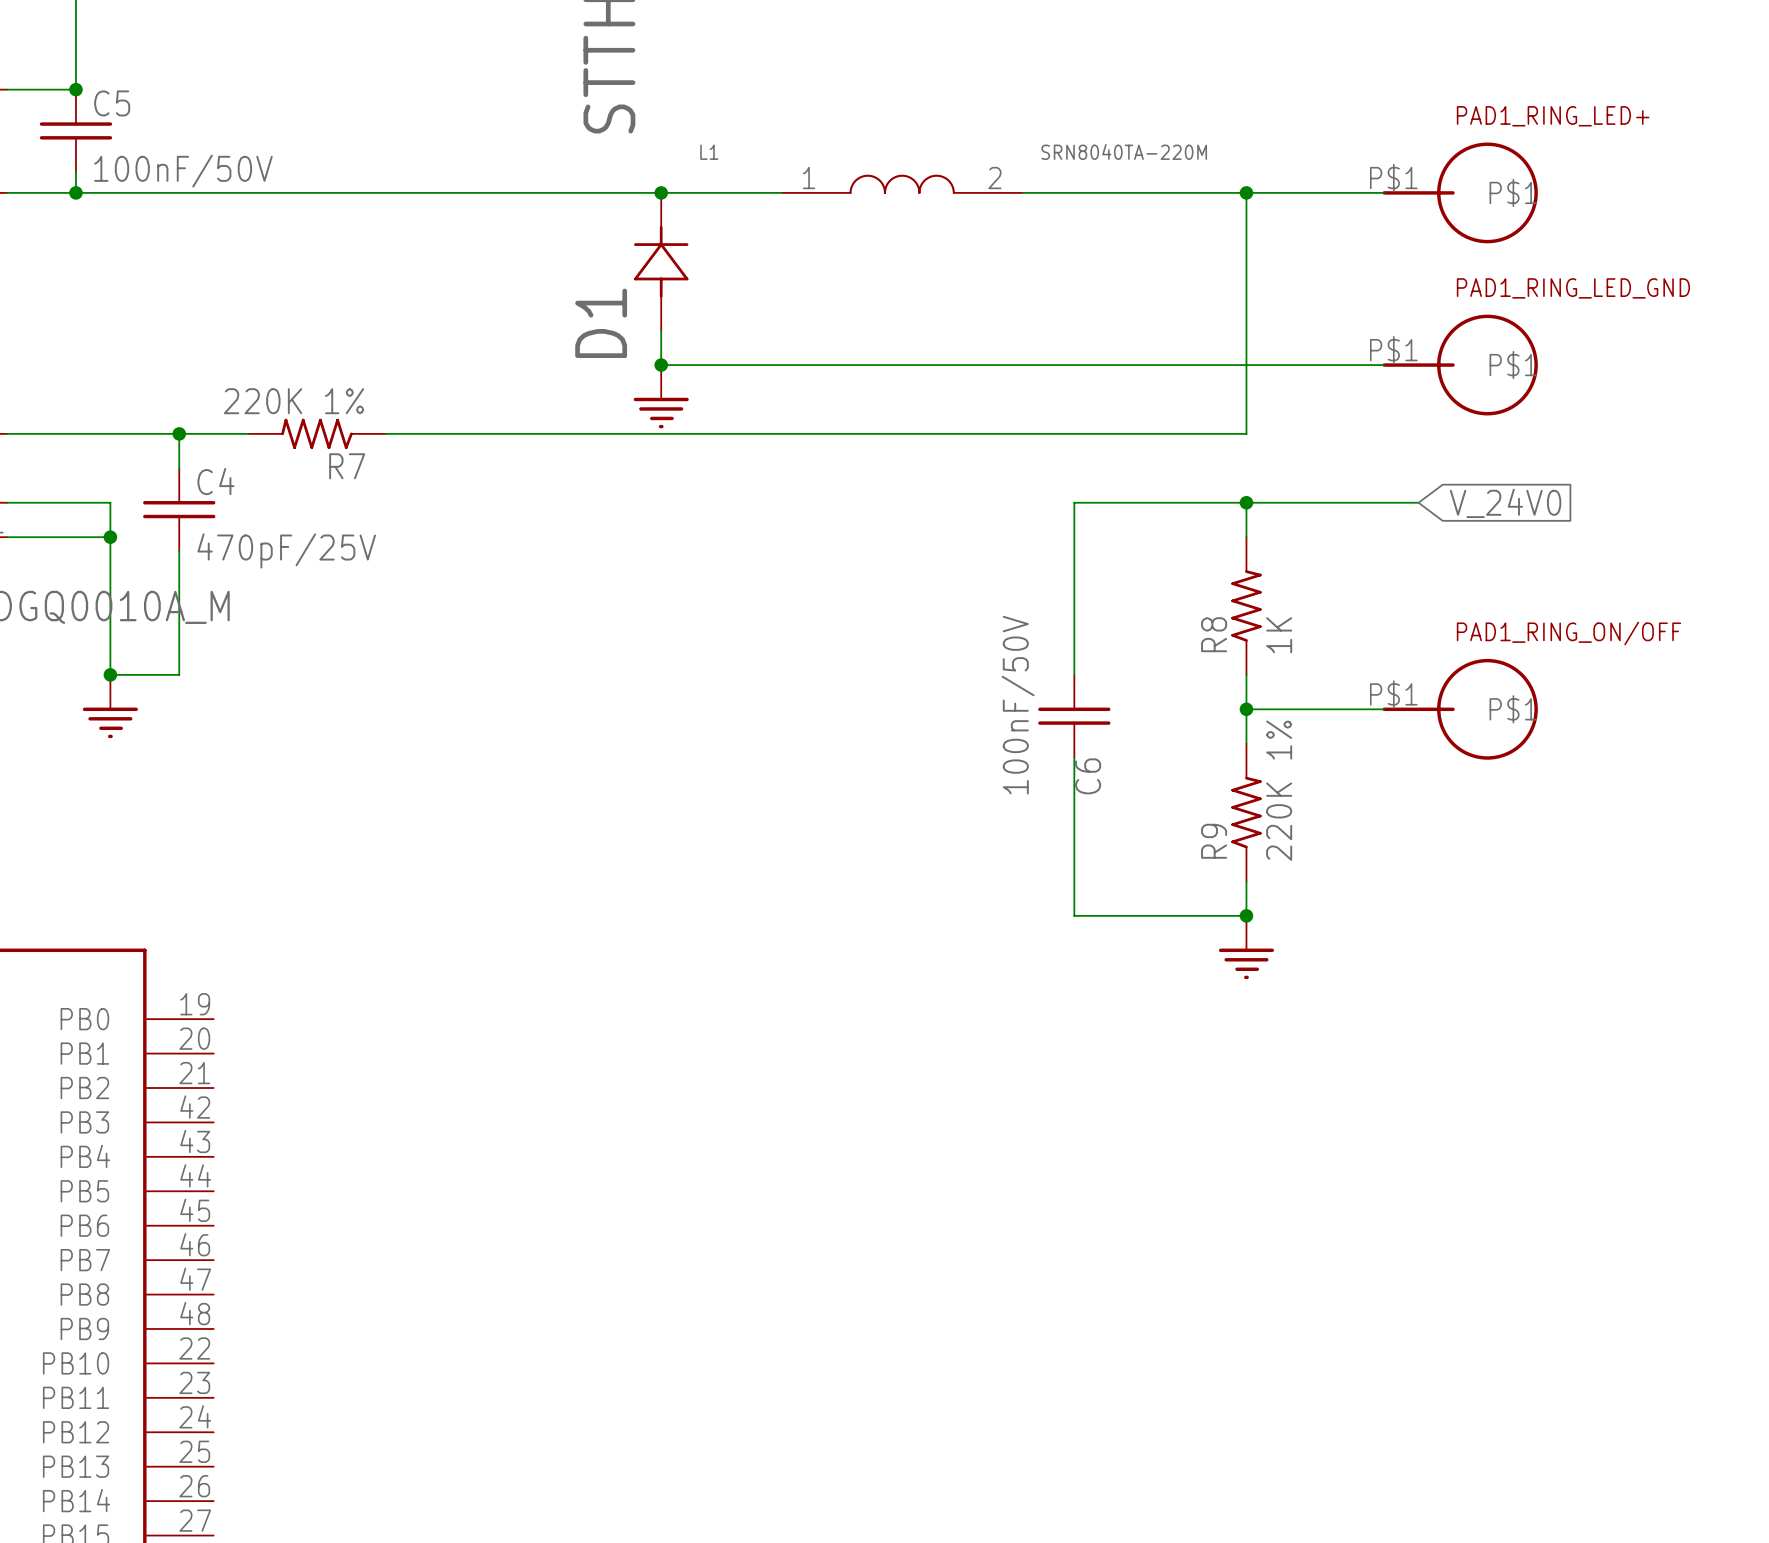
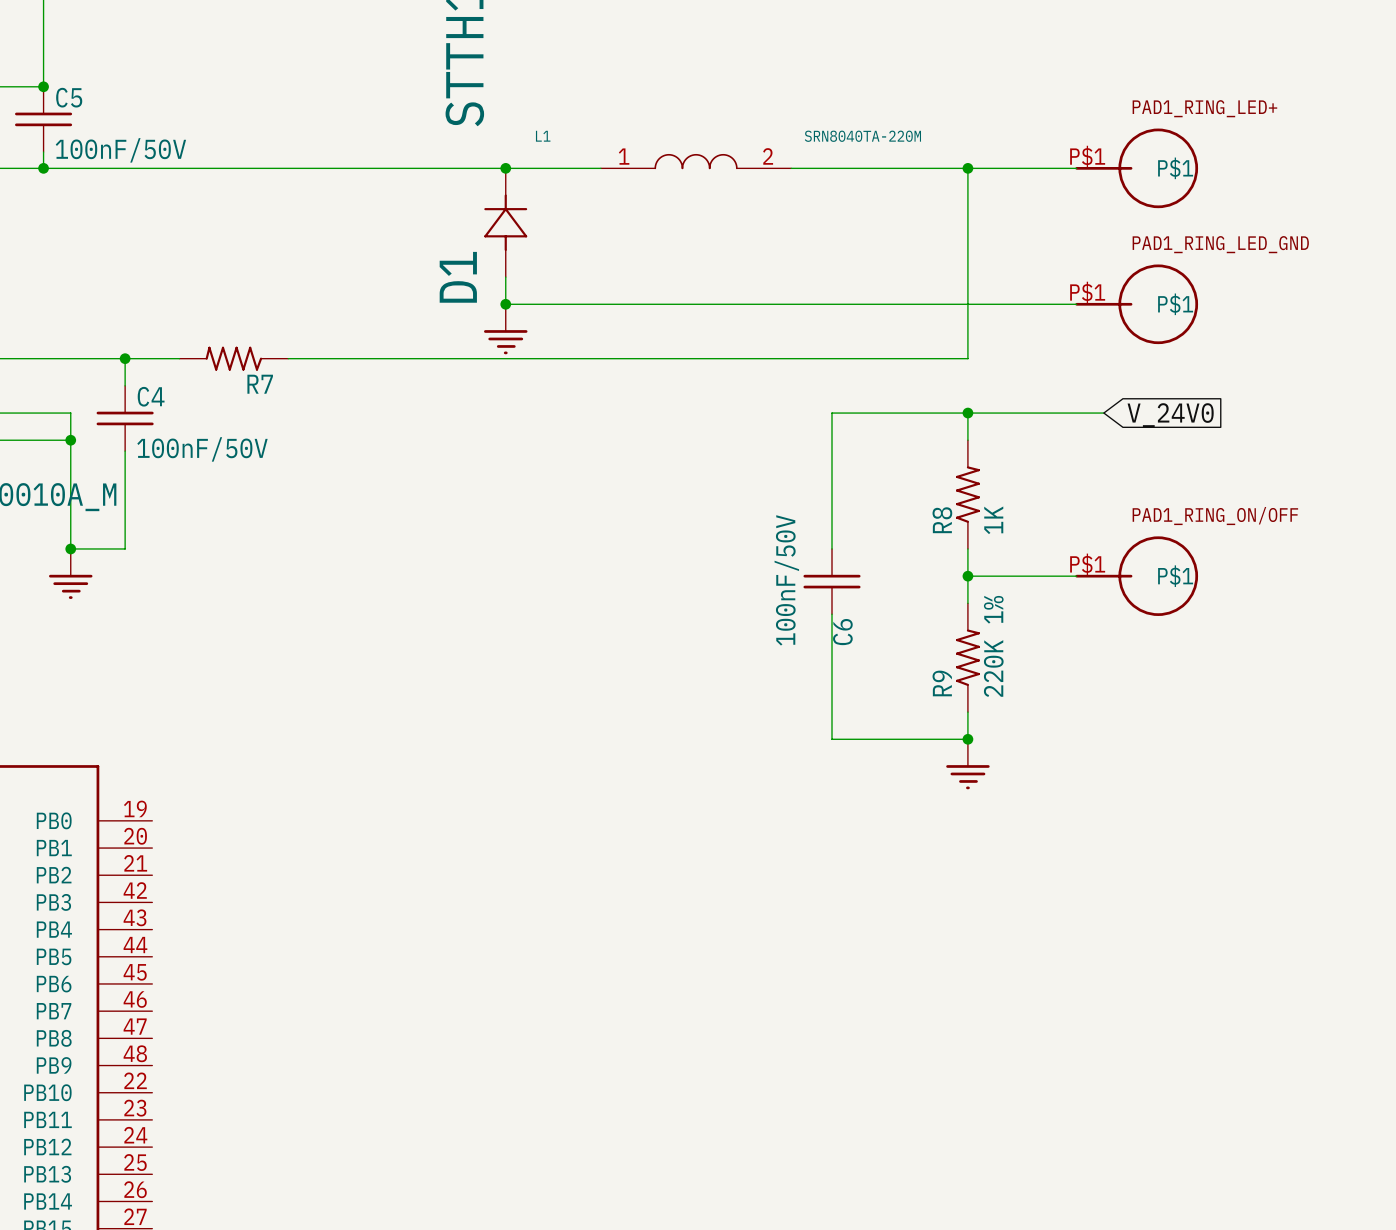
R7 value: 220K 1% (293, 401) -> none
C4 value: 470pF/25V (286, 550) -> 100nF/50V (202, 449)

